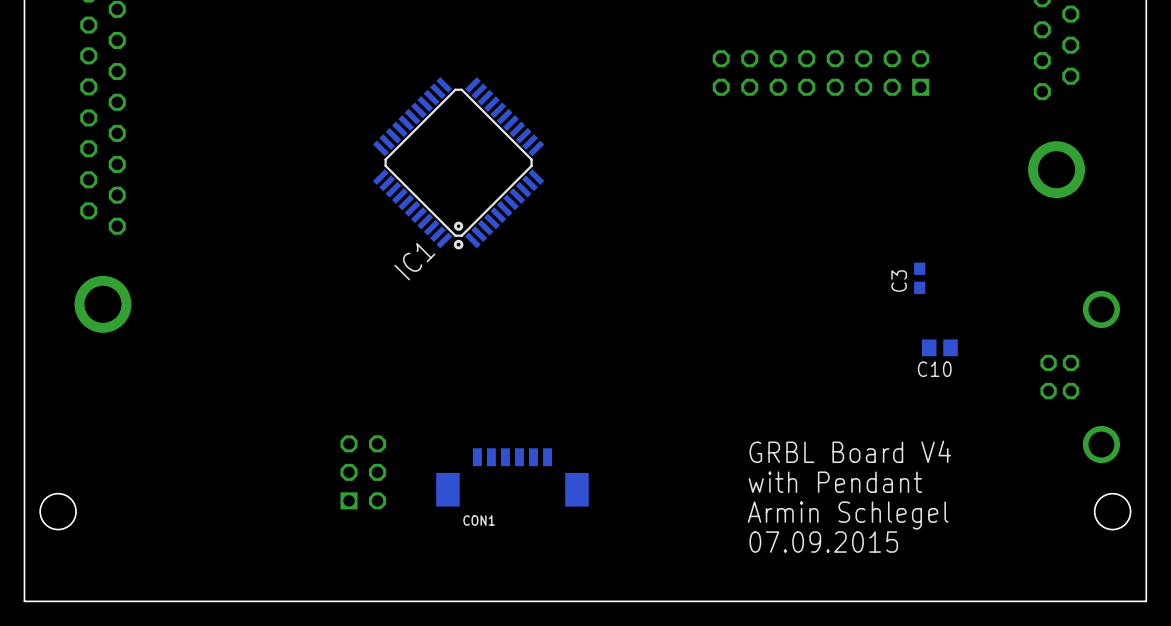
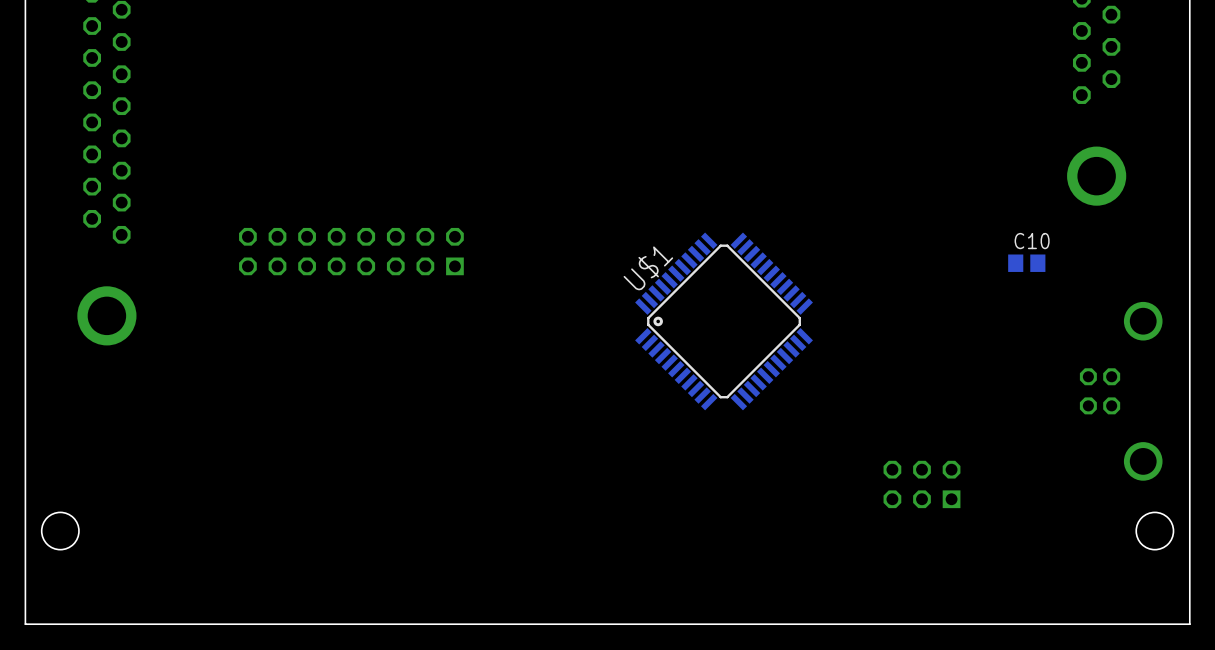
part: (820, 72) -> none
IC1: (458, 162) -> none
drawing: [453, 239, 464, 250] -> none
part: none -> (351, 251)
C3: (919, 278) -> none
U$1: none -> (724, 321)
C10 position: (939, 347) -> (1026, 263)
C10 name position: C10 (934, 369) -> C10 (1032, 241)
text: GRBL Board V4 (850, 451) -> none
part: none -> (921, 484)
part: (363, 472) -> none
CON1: (512, 477) -> none
text: with Pendant (835, 482) -> none
text: Armin Schlegel (848, 515) -> none
text: 07.09.2015 (823, 542) -> none

